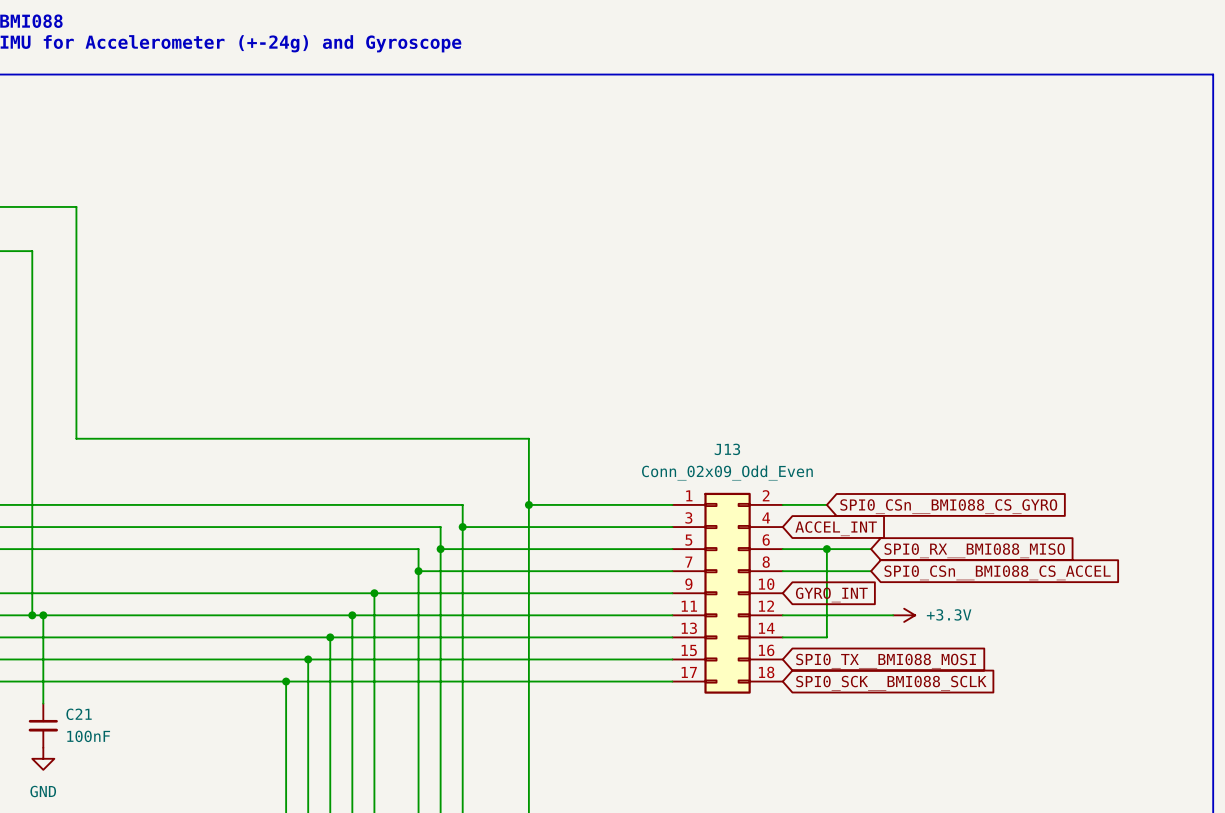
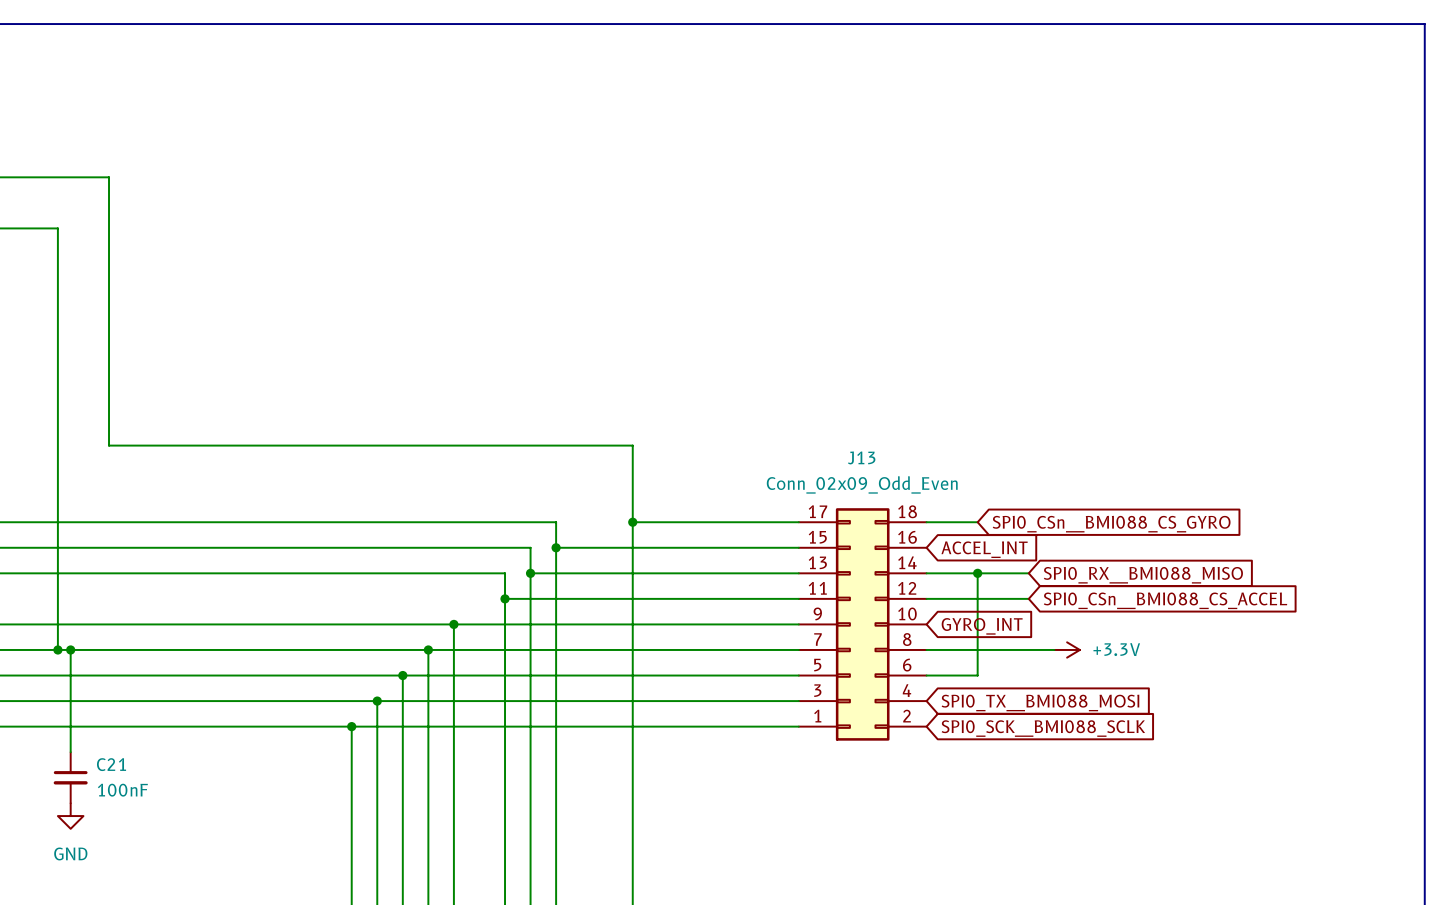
J13 flip: as is (727, 593) -> up-down (862, 624)

